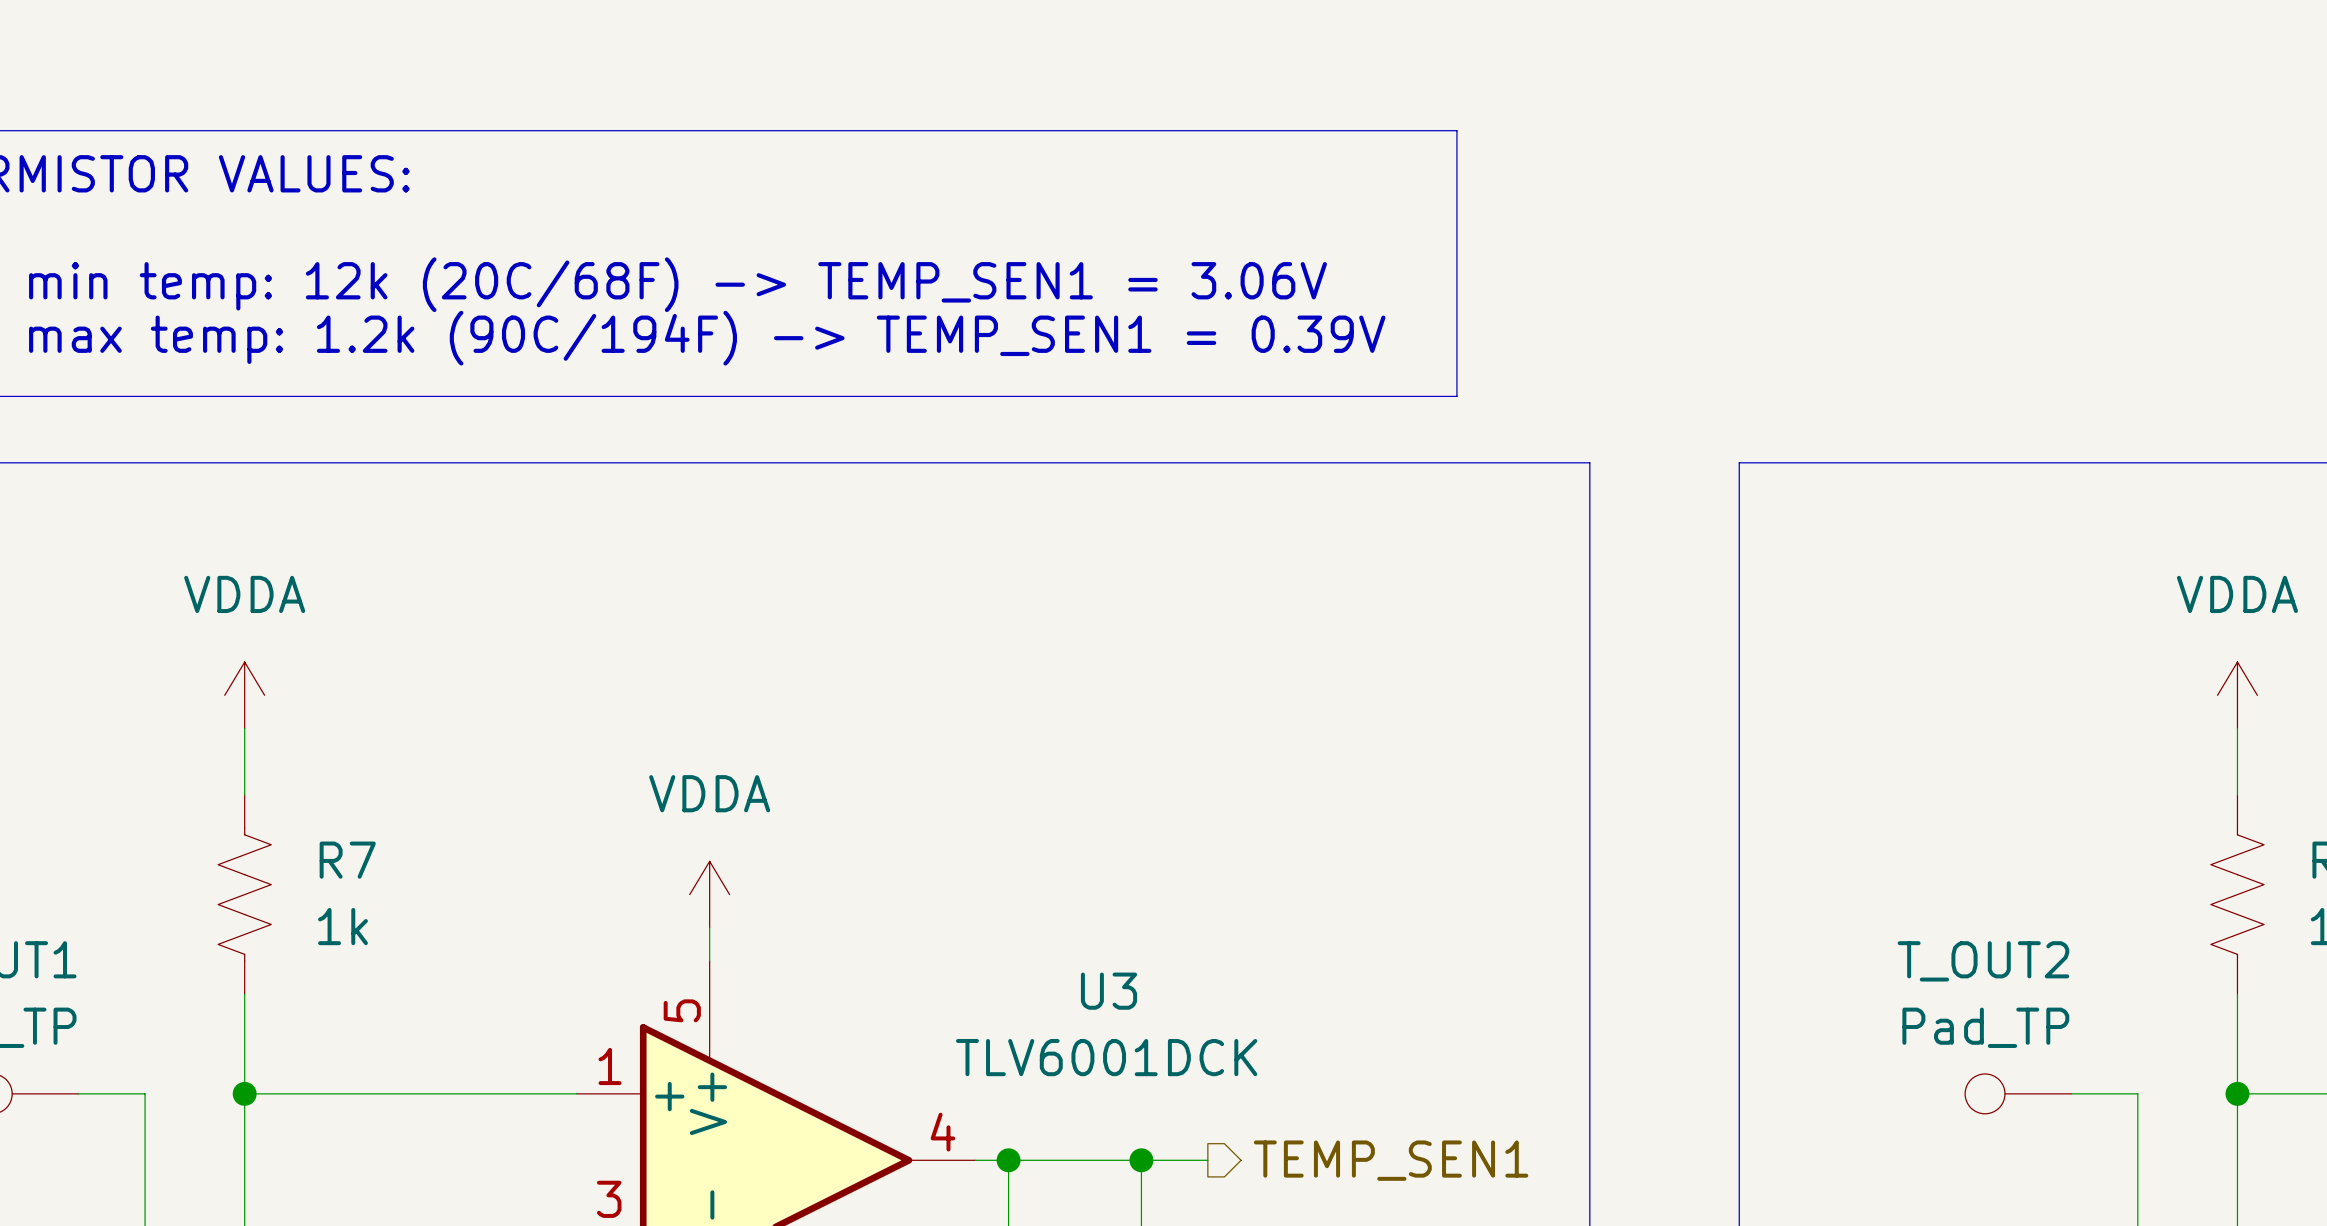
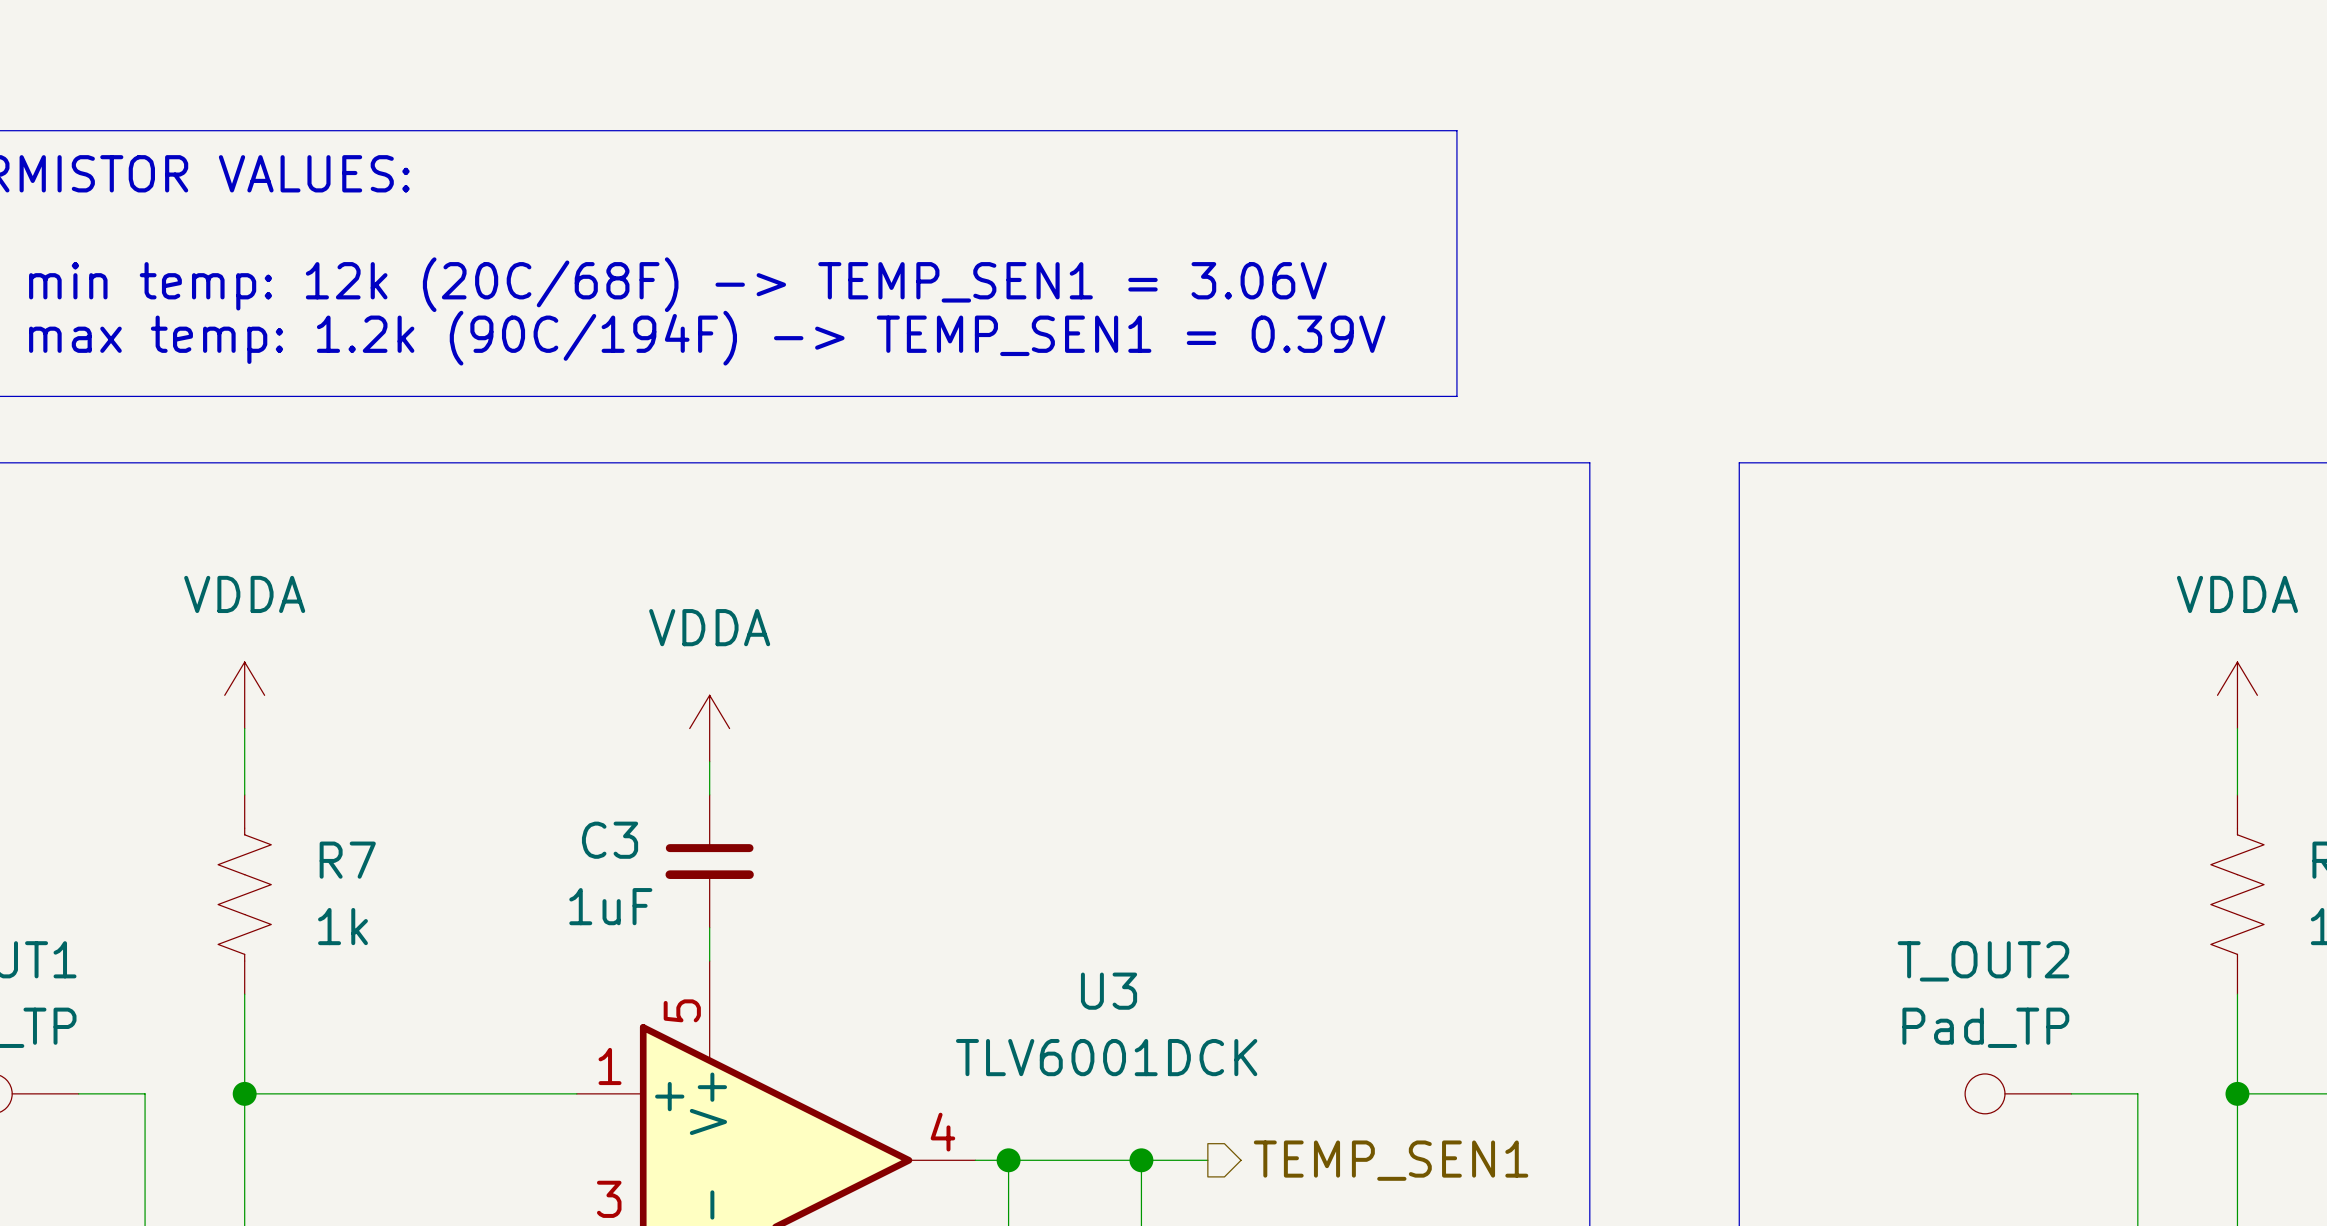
wire: none -> (709, 761) (709, 794)
C3: none -> 1uF (709, 861)
power symbol position: VDDA (709, 894) -> VDDA (709, 728)

